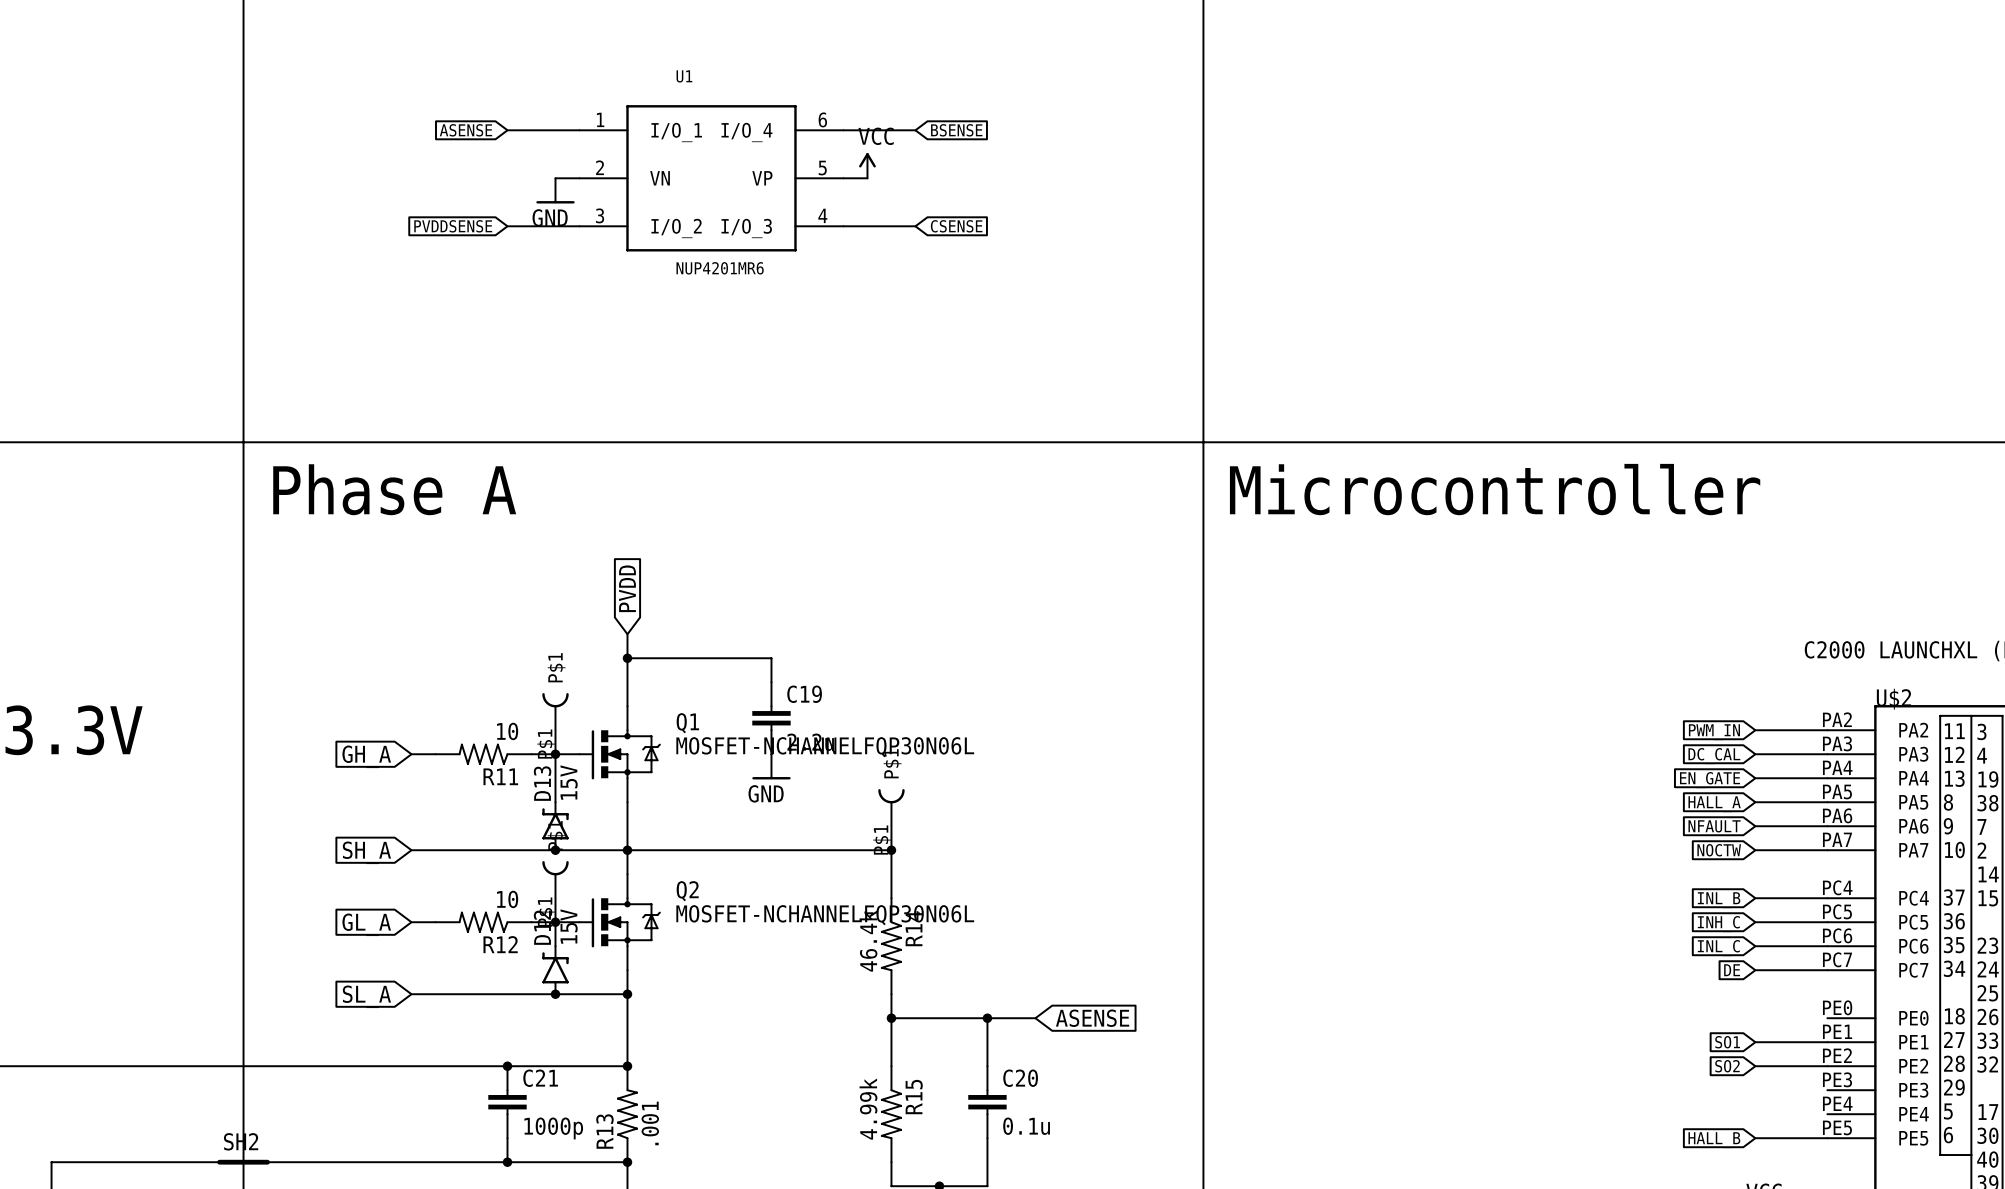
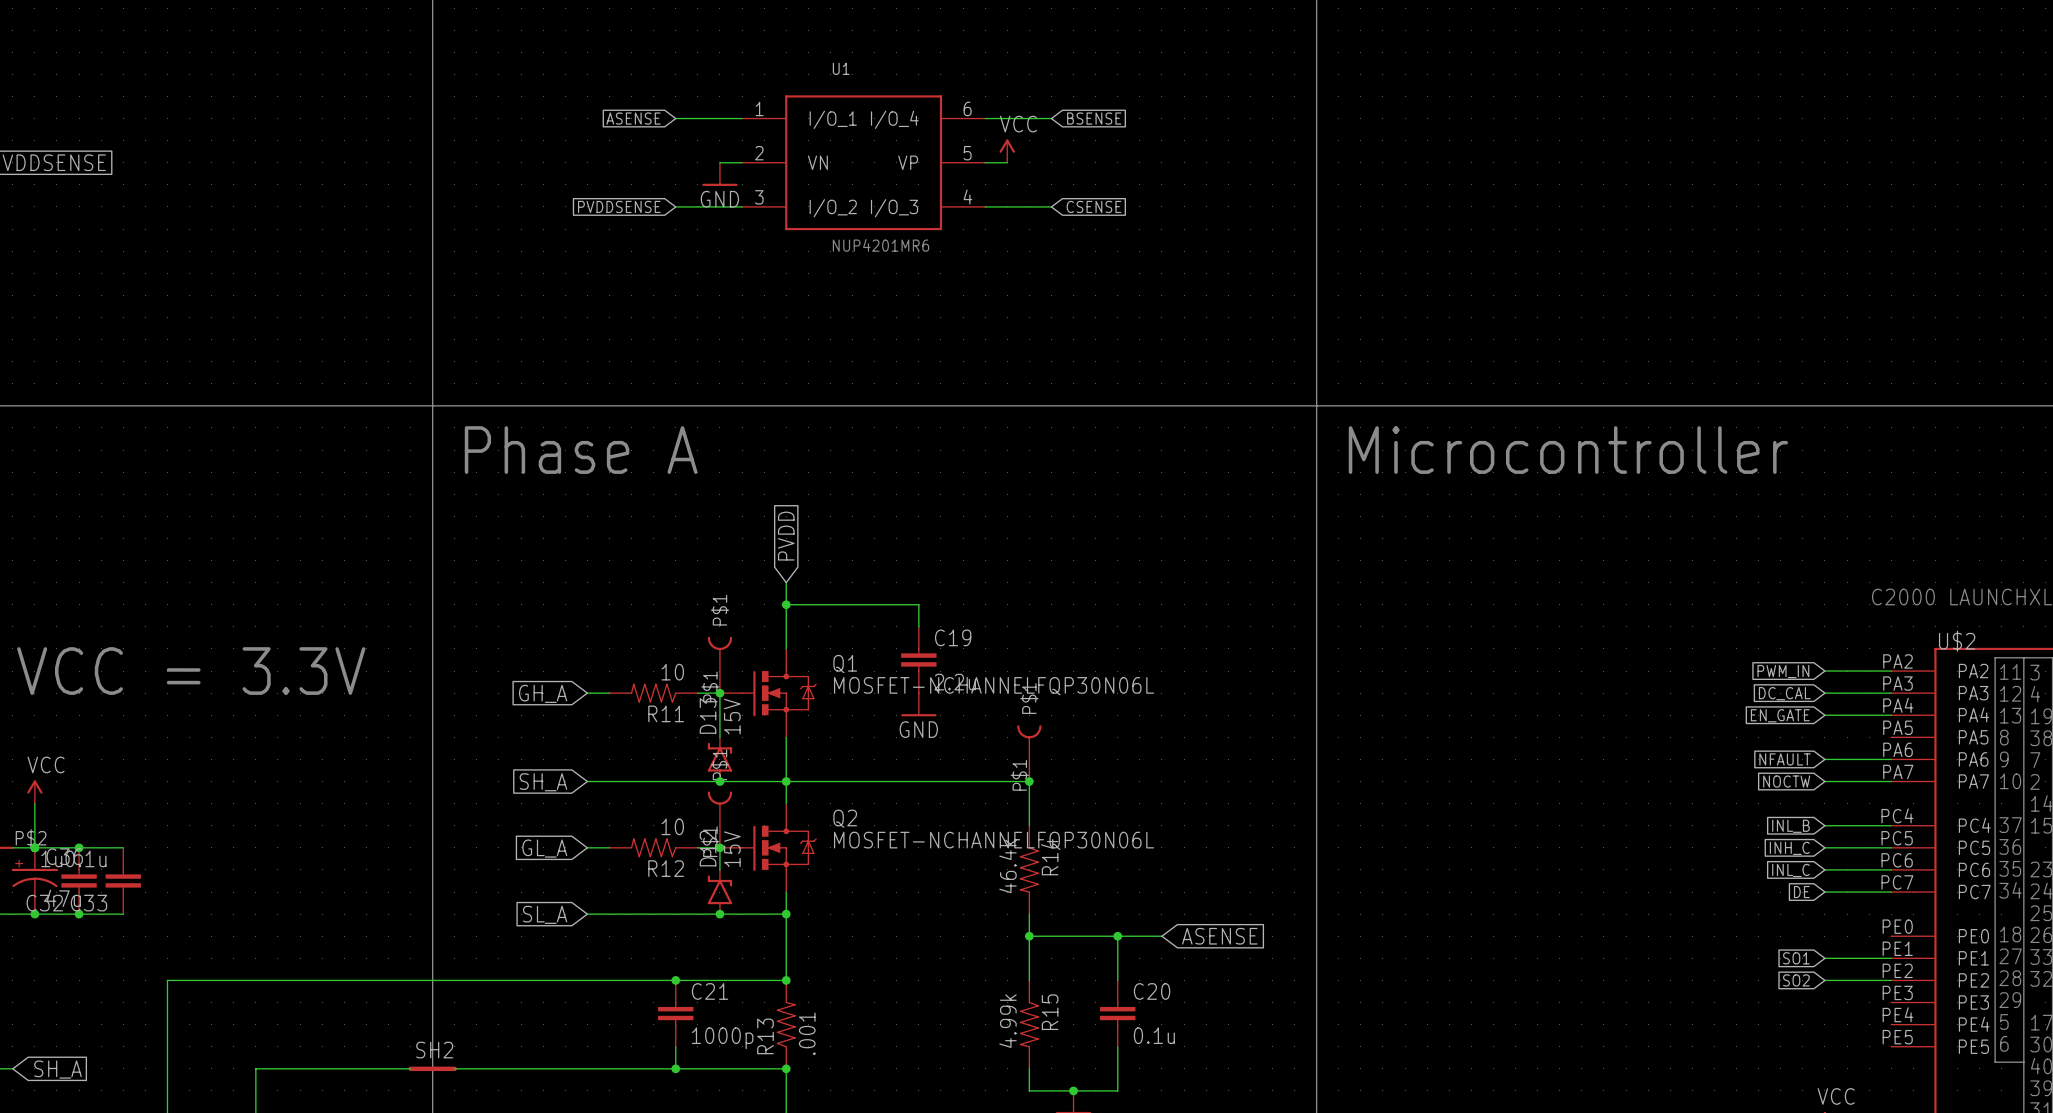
wire: (1755, 802) (1827, 802) -> none
global label: HALL_A (1714, 804) -> none
wire: (1755, 1138) (1827, 1138) -> none
global label: HALL_B (1714, 1140) -> none

